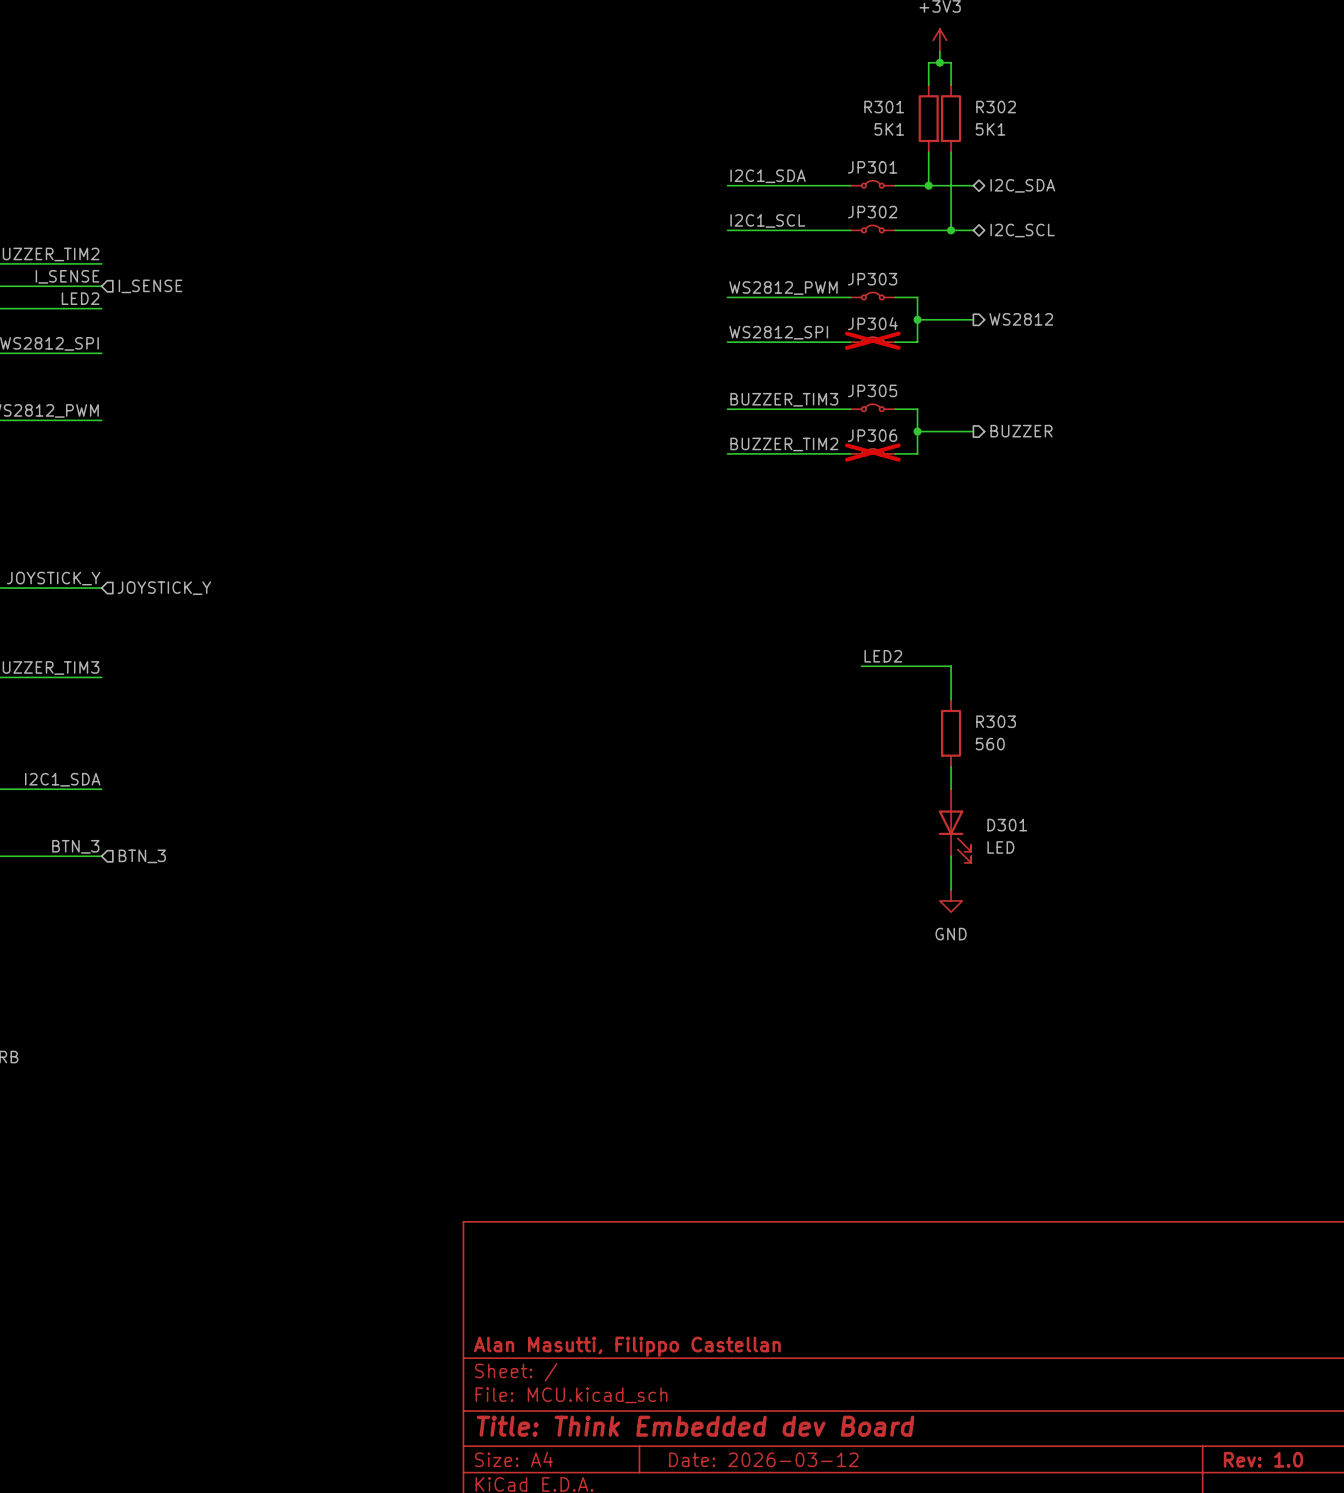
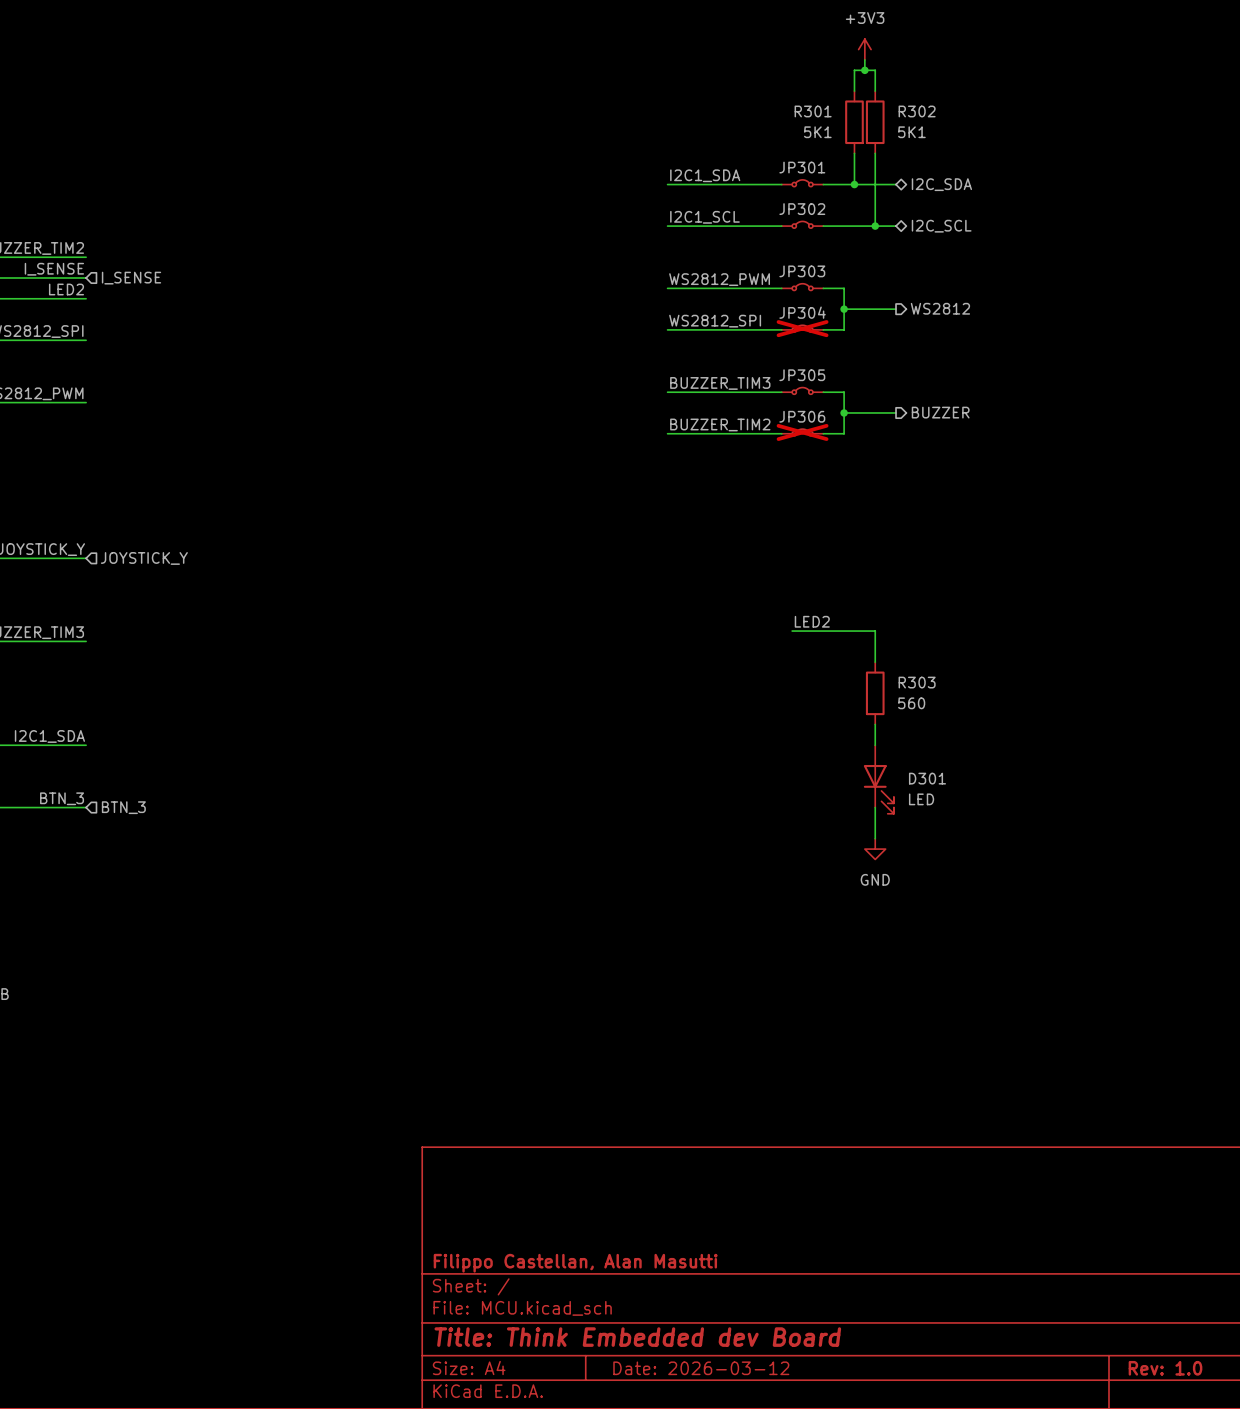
title block: Alan Masutti, Filippo Castellan (627, 1346) -> Filippo Castellan, Alan Masutti (575, 1263)

